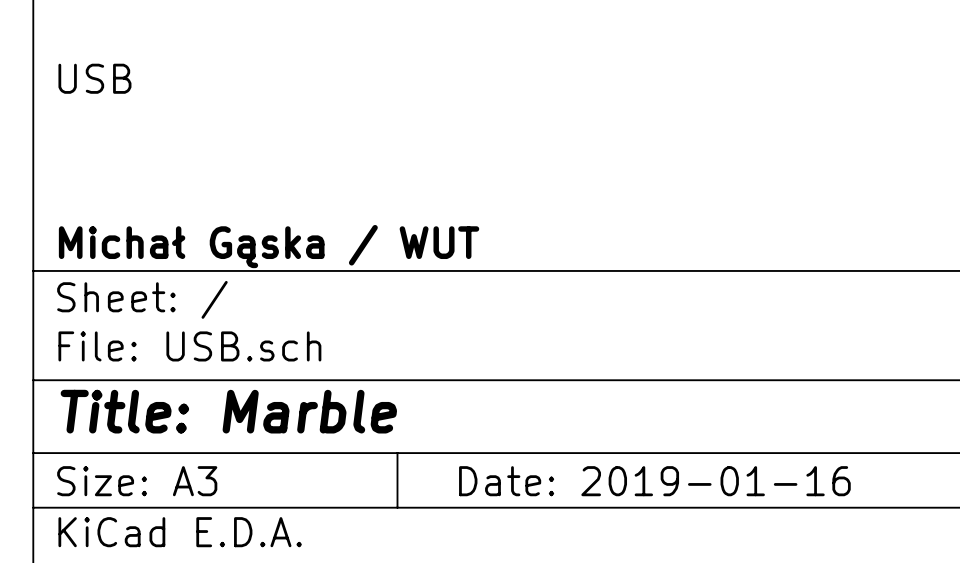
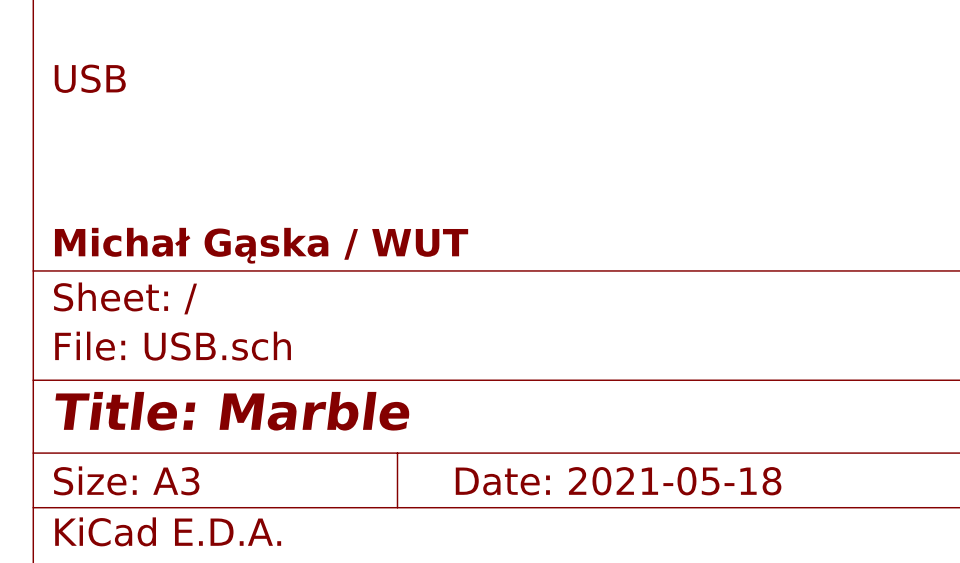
title block: Date: 2019-01-16 (654, 481) -> Date: 2021-05-18 (618, 481)

